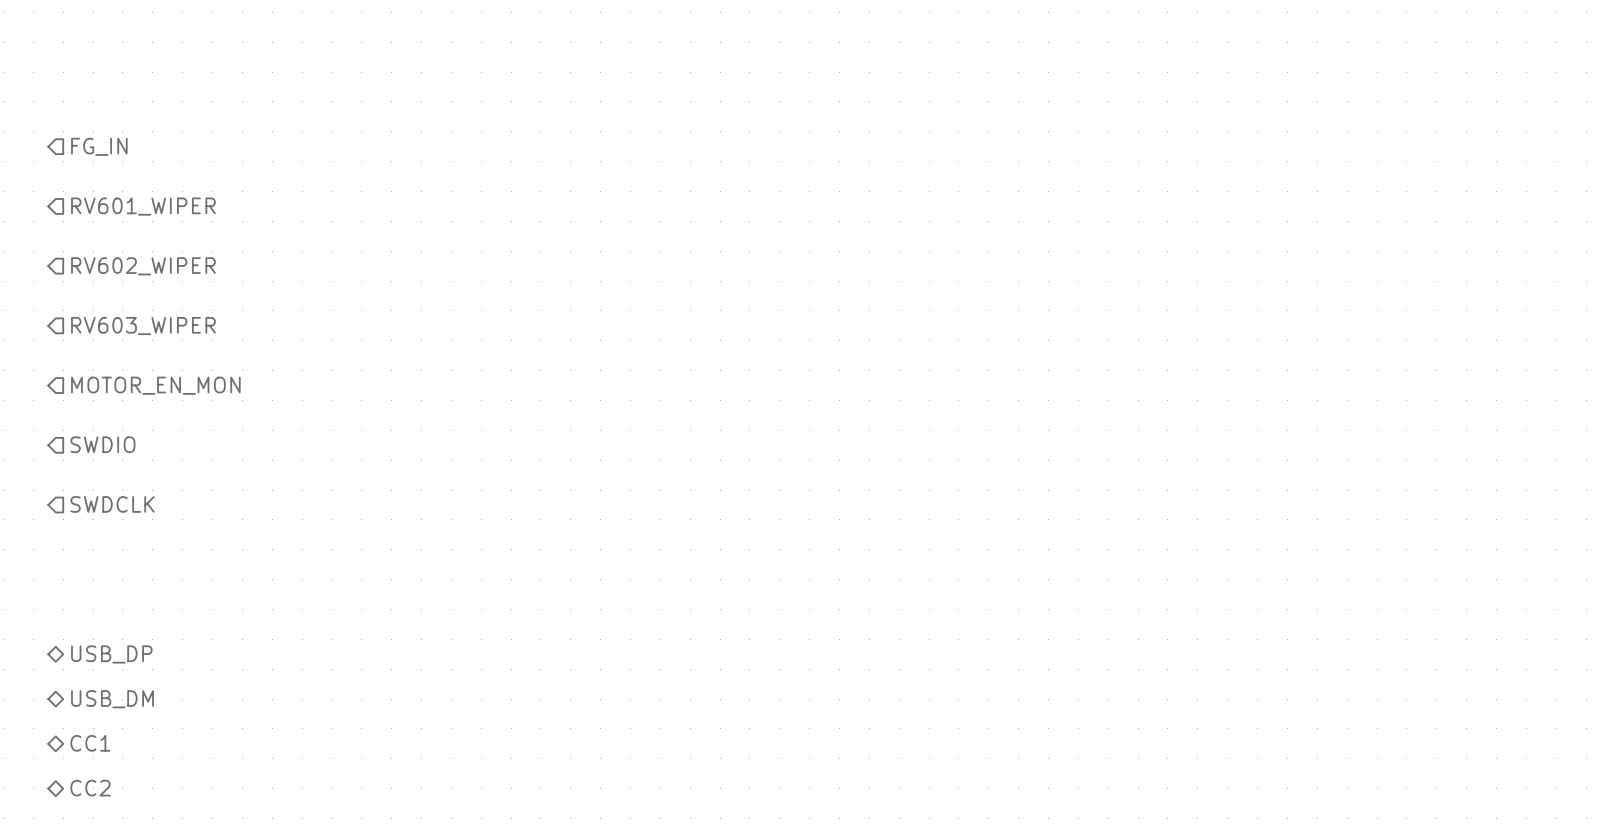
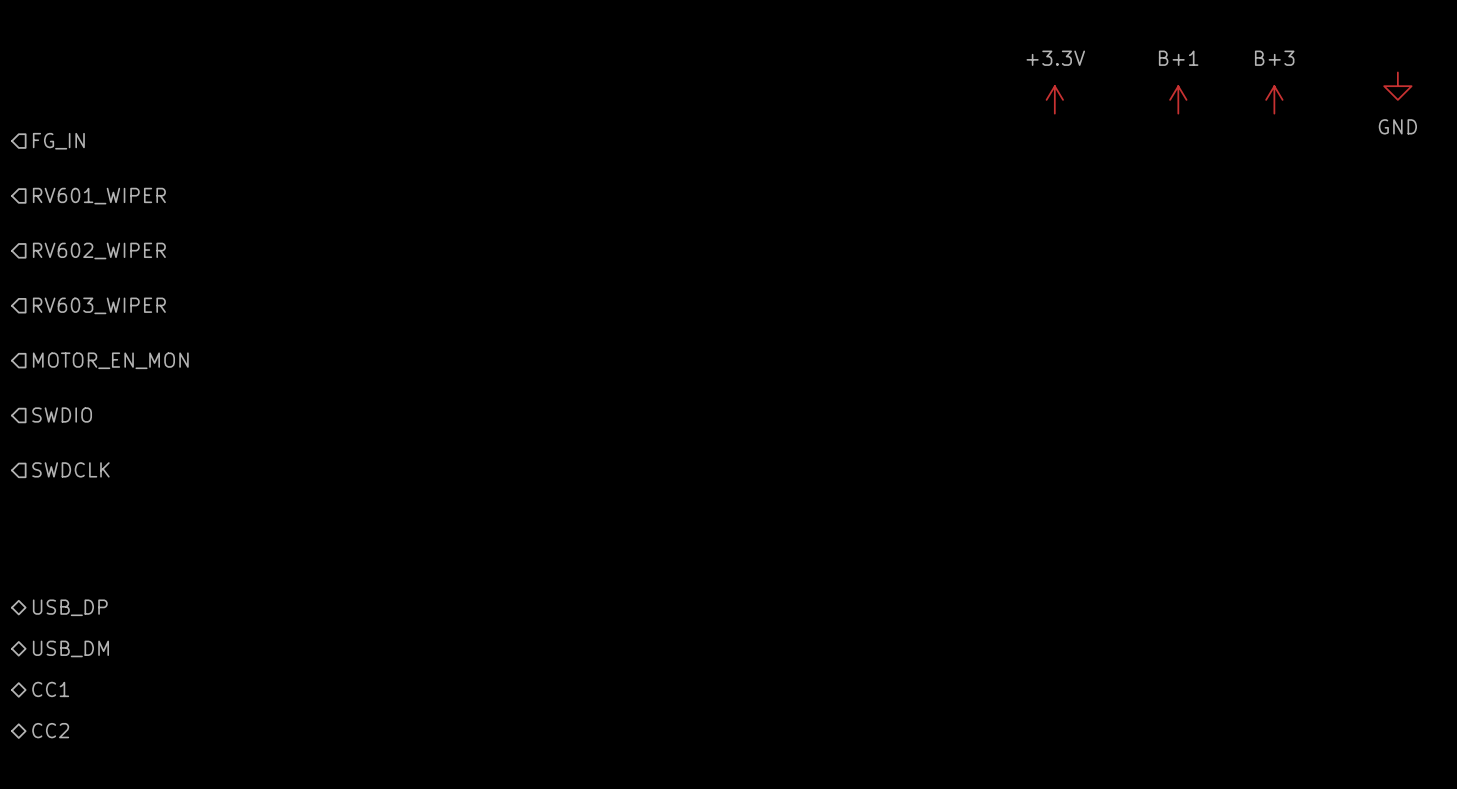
power symbol: none -> GND (1397, 86)
power symbol: none -> +3.3V (1054, 99)
power symbol: none -> B+1 (1178, 99)
power symbol: none -> B+3 (1274, 99)

